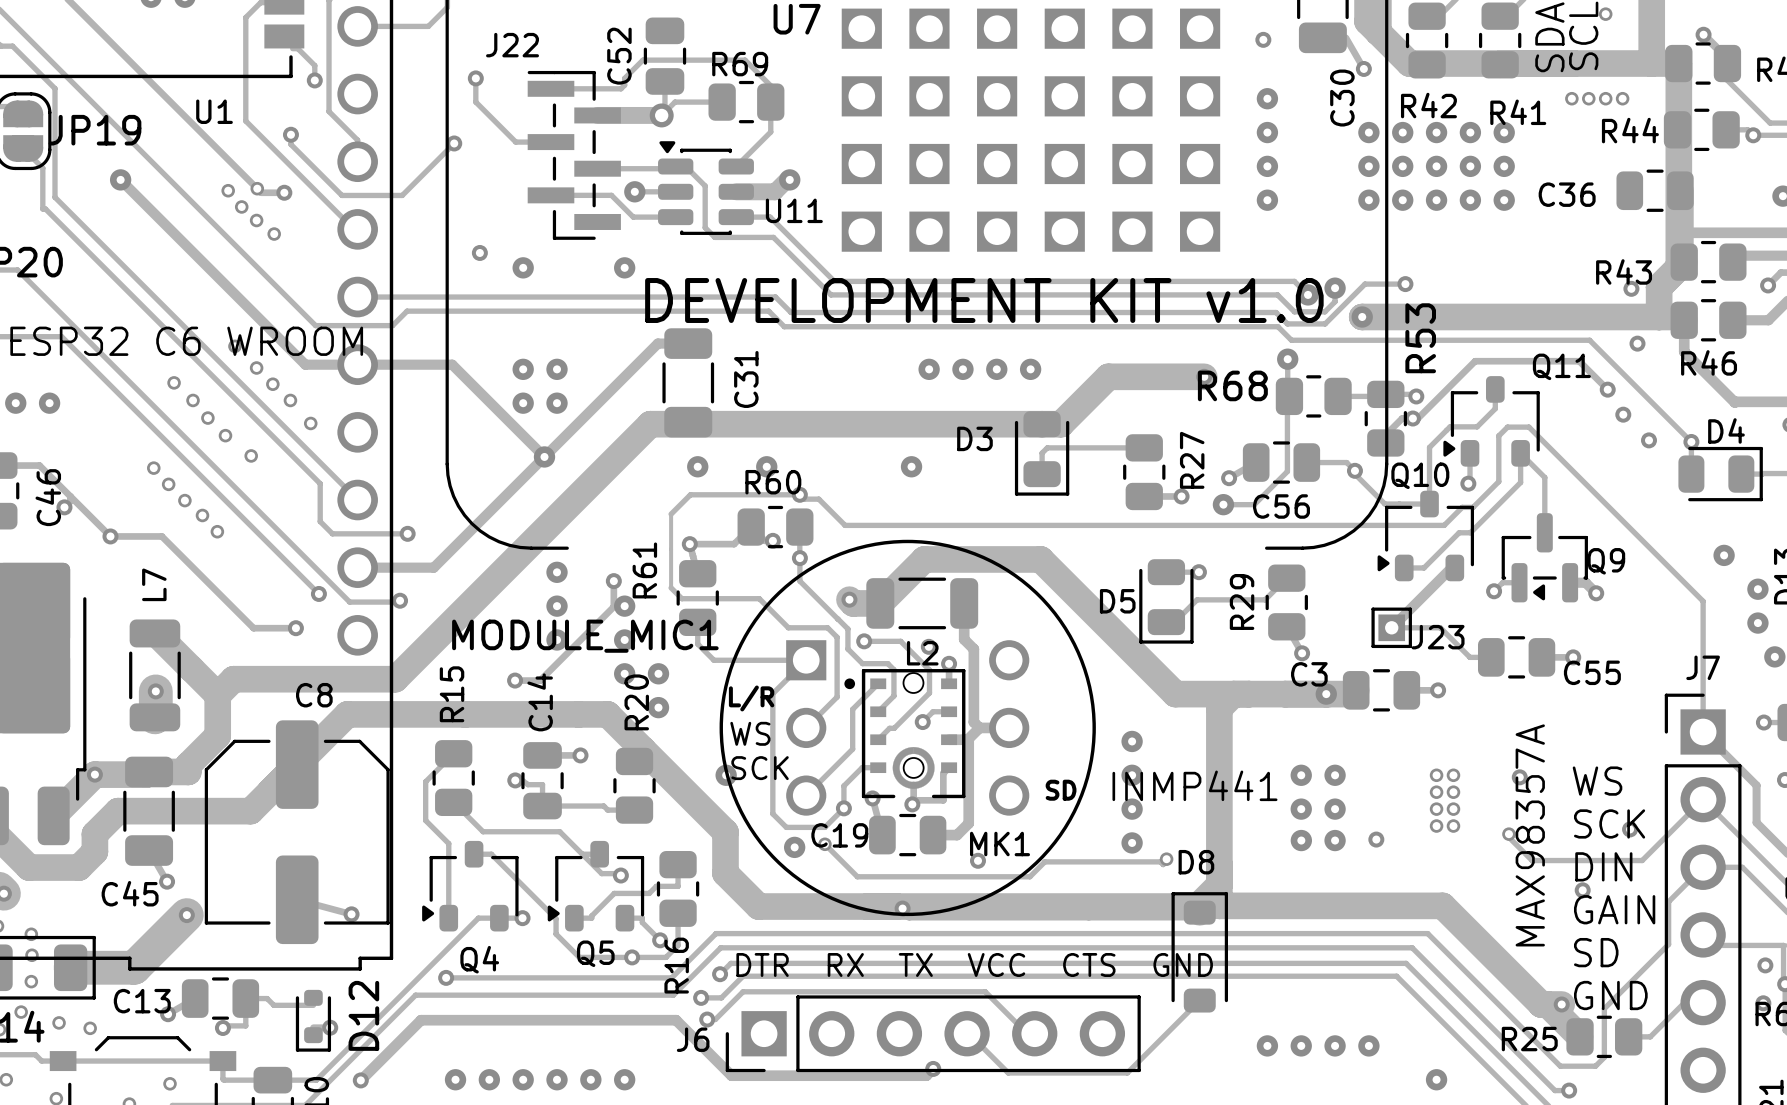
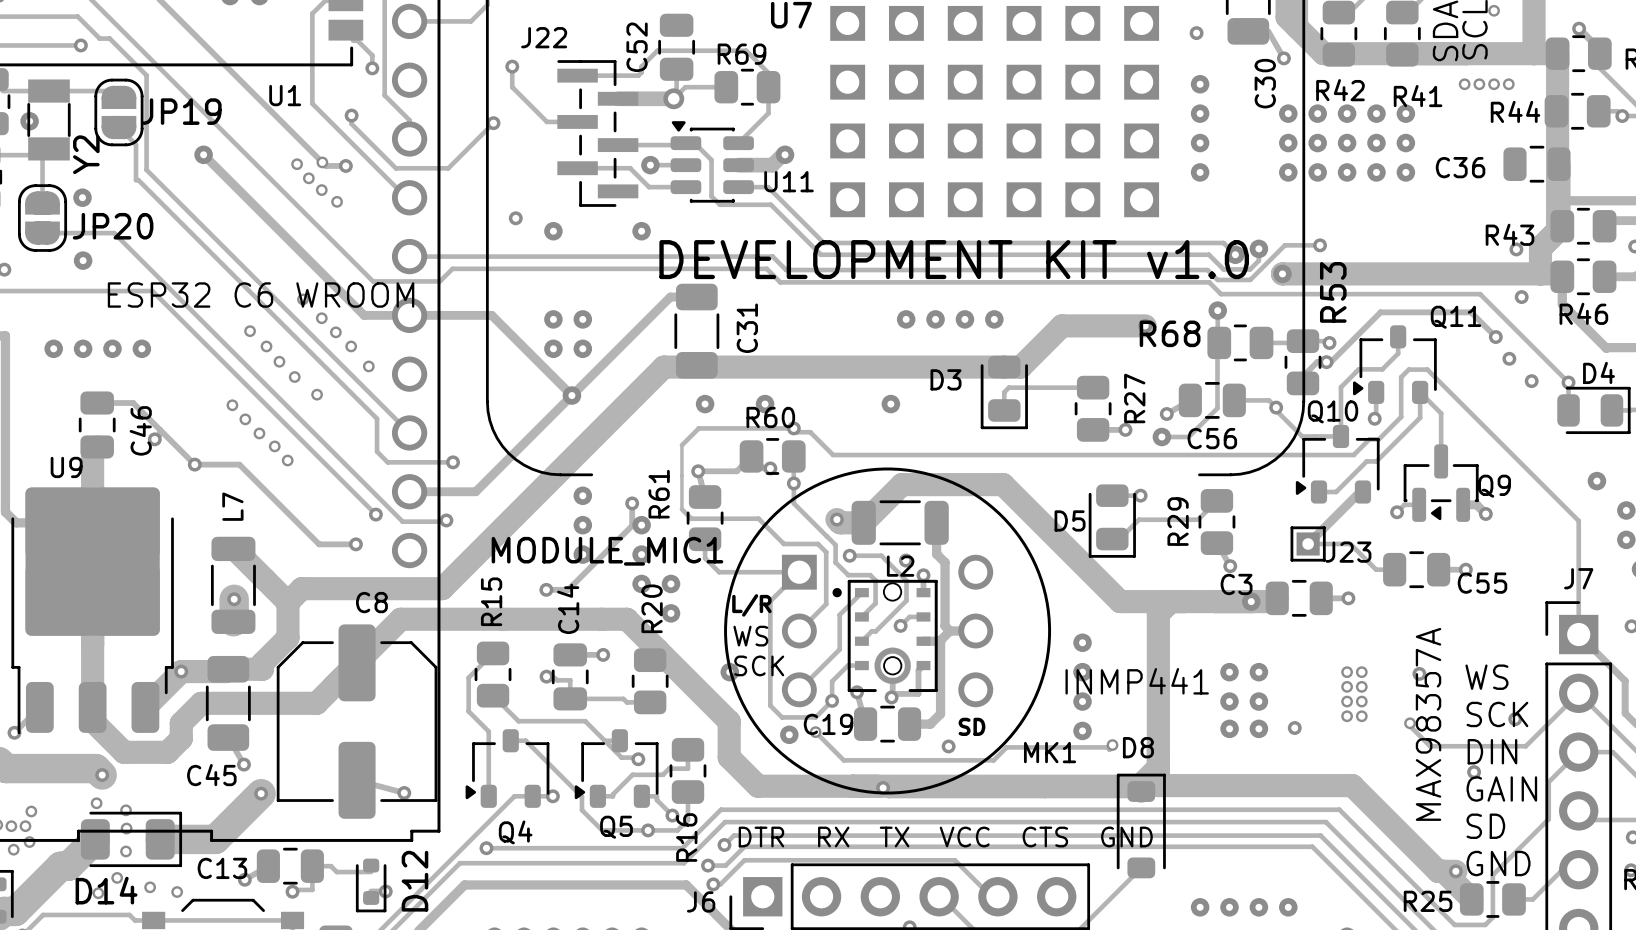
MODULE_MIC1 text position: SD (1061, 790) -> SD (972, 726)
MK1 name position: MK1 (1000, 844) -> MK1 (1050, 752)

